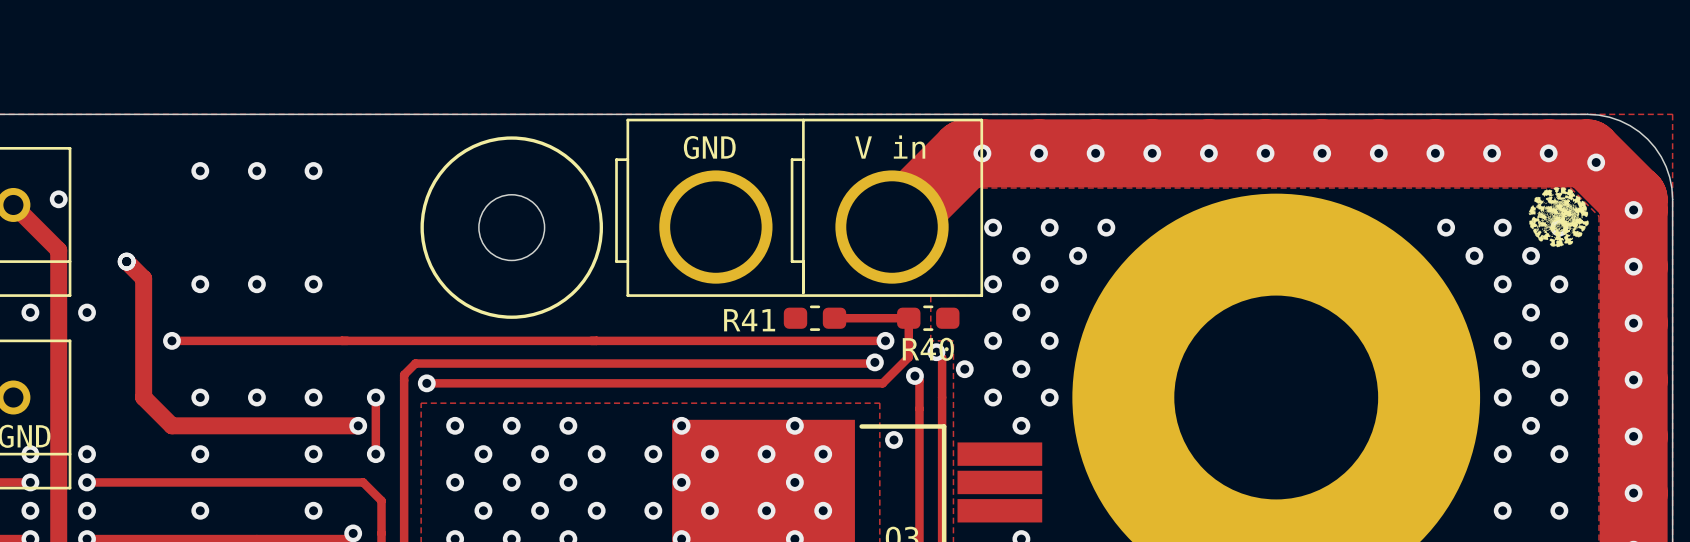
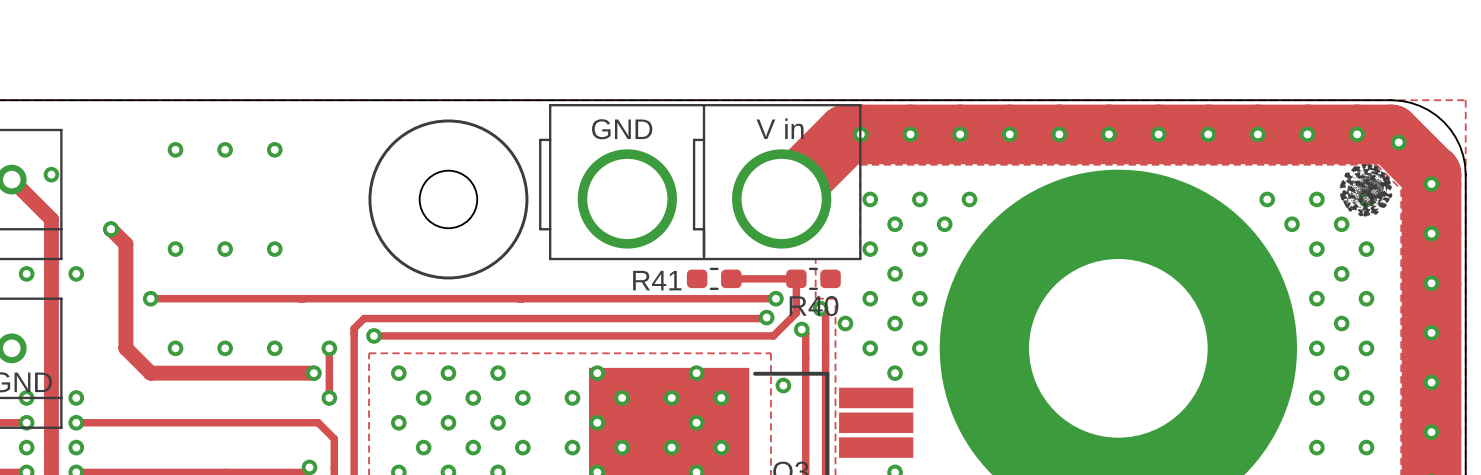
via: (200, 454) -> none
via: (313, 454) -> none
via: (200, 510) -> none
via: (313, 510) -> none

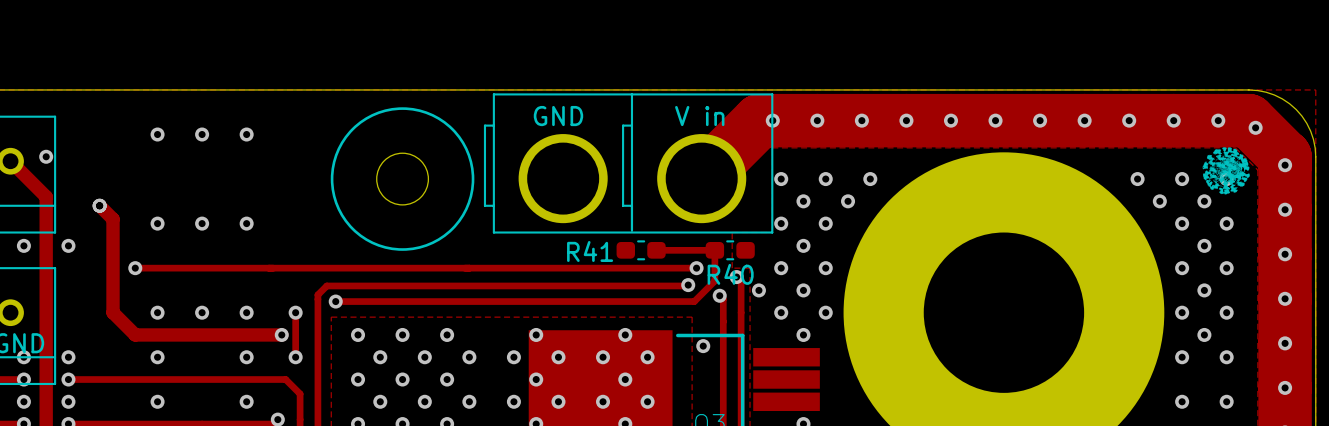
via: none -> (157, 357)
via: none -> (246, 357)
via: none -> (157, 401)
via: none -> (246, 401)

